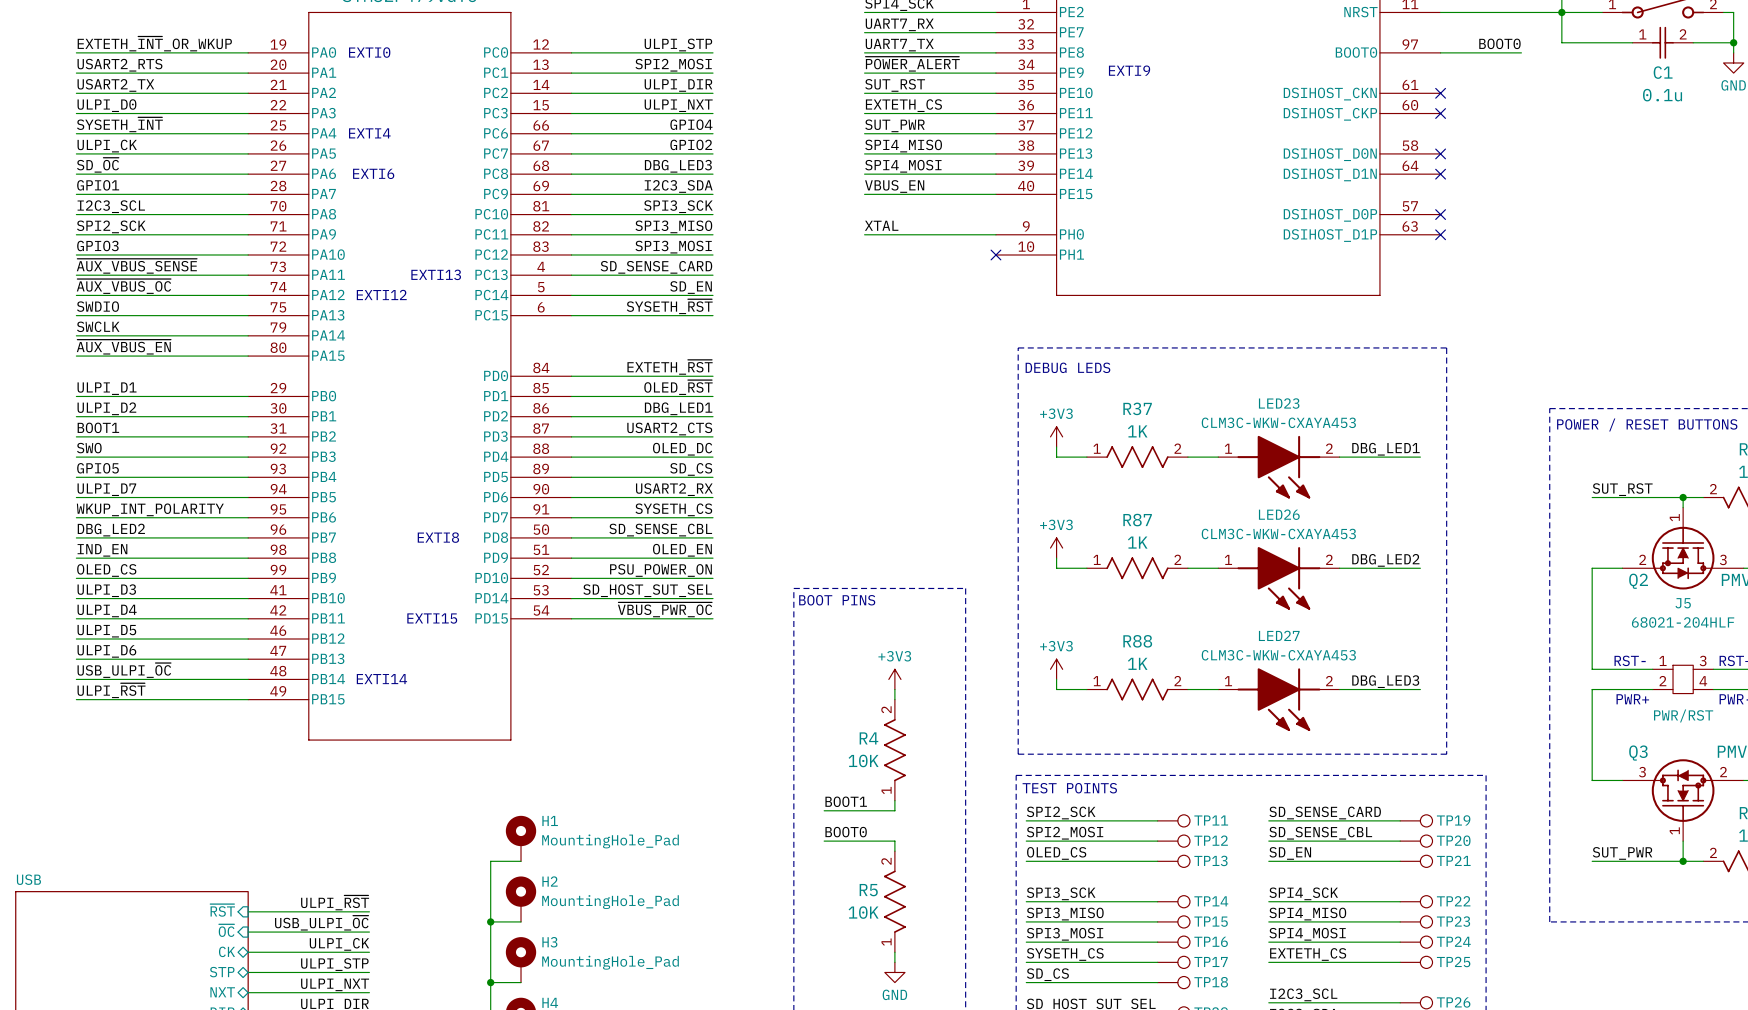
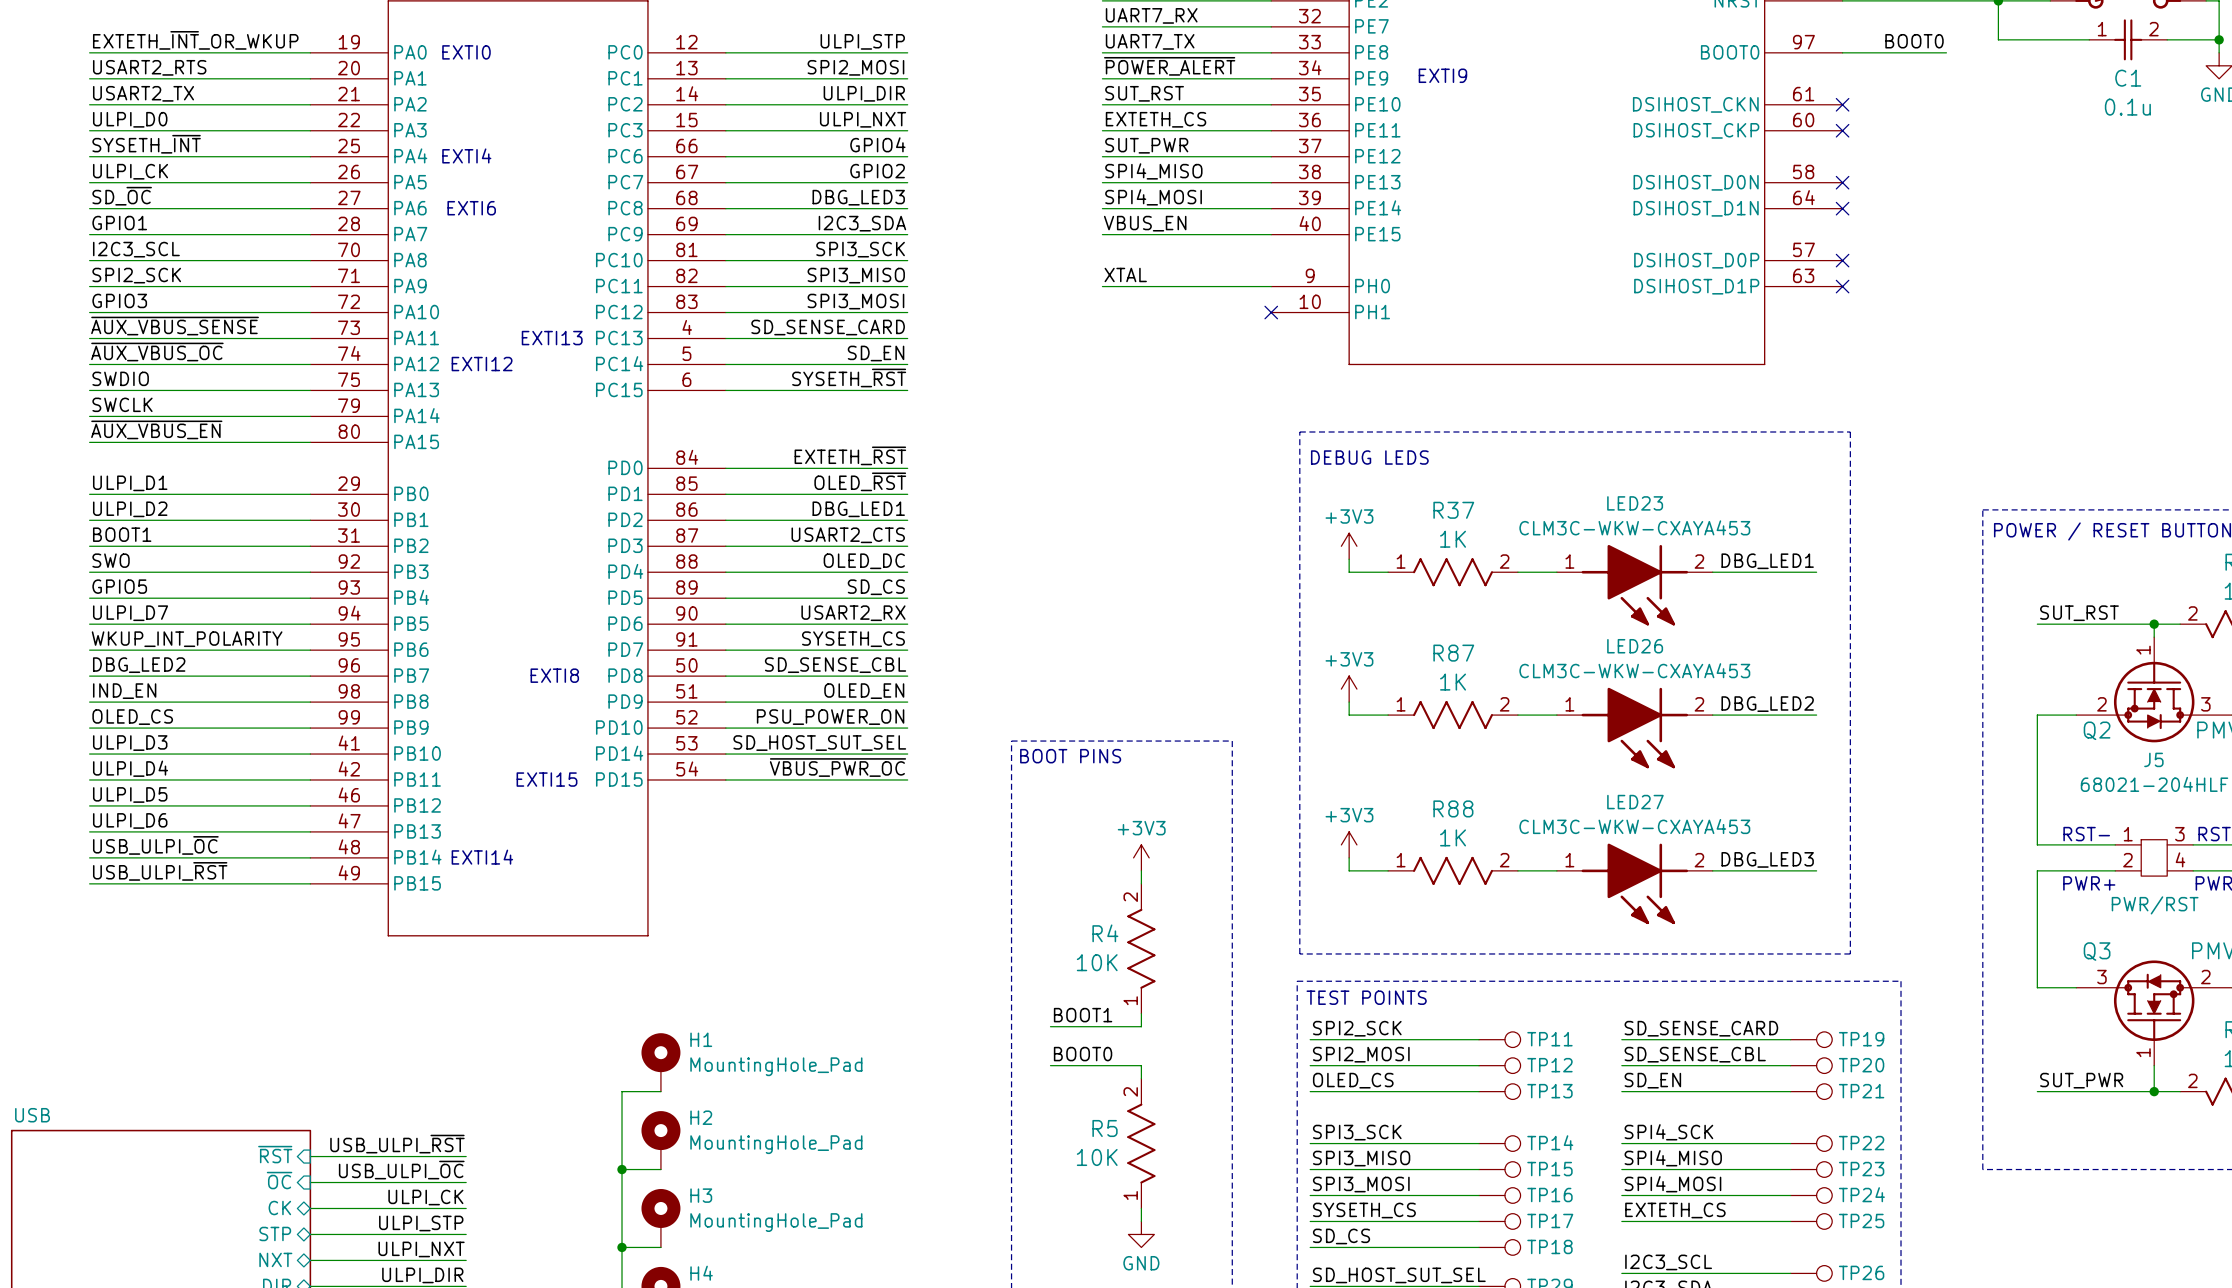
label: ULPI_~{RST} (111, 690) -> USB_ULPI_~{RST} (160, 871)
label: ULPI_~{RST} (335, 902) -> USB_ULPI_~{RST} (397, 1144)

